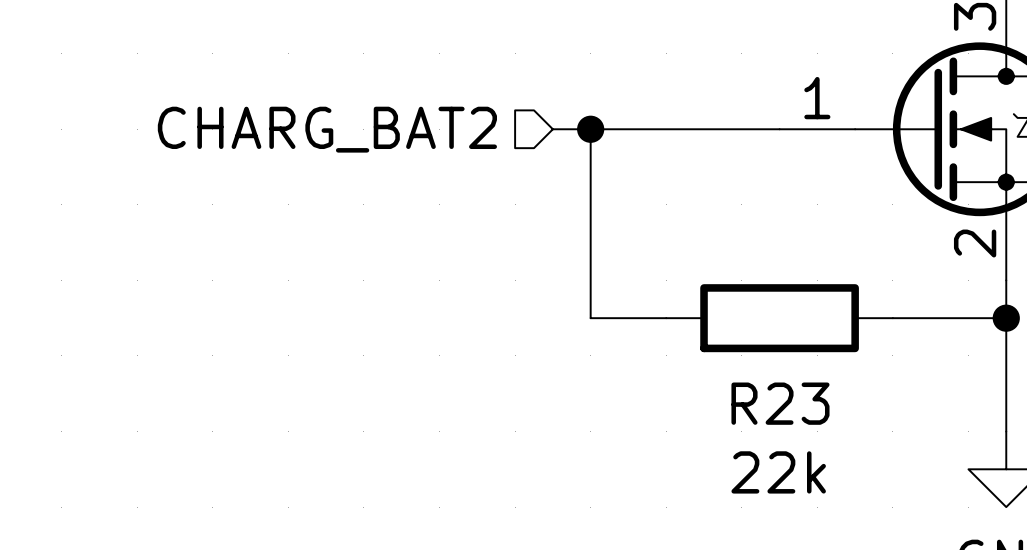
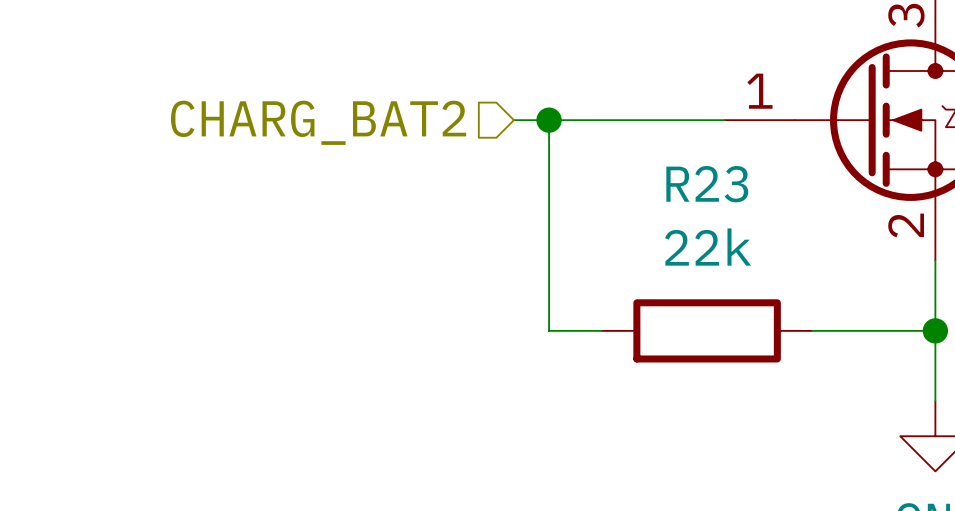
wire: (590, 318) (666, 318) -> (549, 295) (549, 330) (601, 330)
R23 position: (779, 318) -> (707, 330)
wire: (892, 318) (1006, 318) -> none
junction position: (1006, 318) -> (935, 330)
wire: none -> (812, 330) (935, 330)
R23 name position: R23 (780, 403) -> R23 (707, 184)
R23 value position: 22k (778, 472) -> 22k (708, 247)

